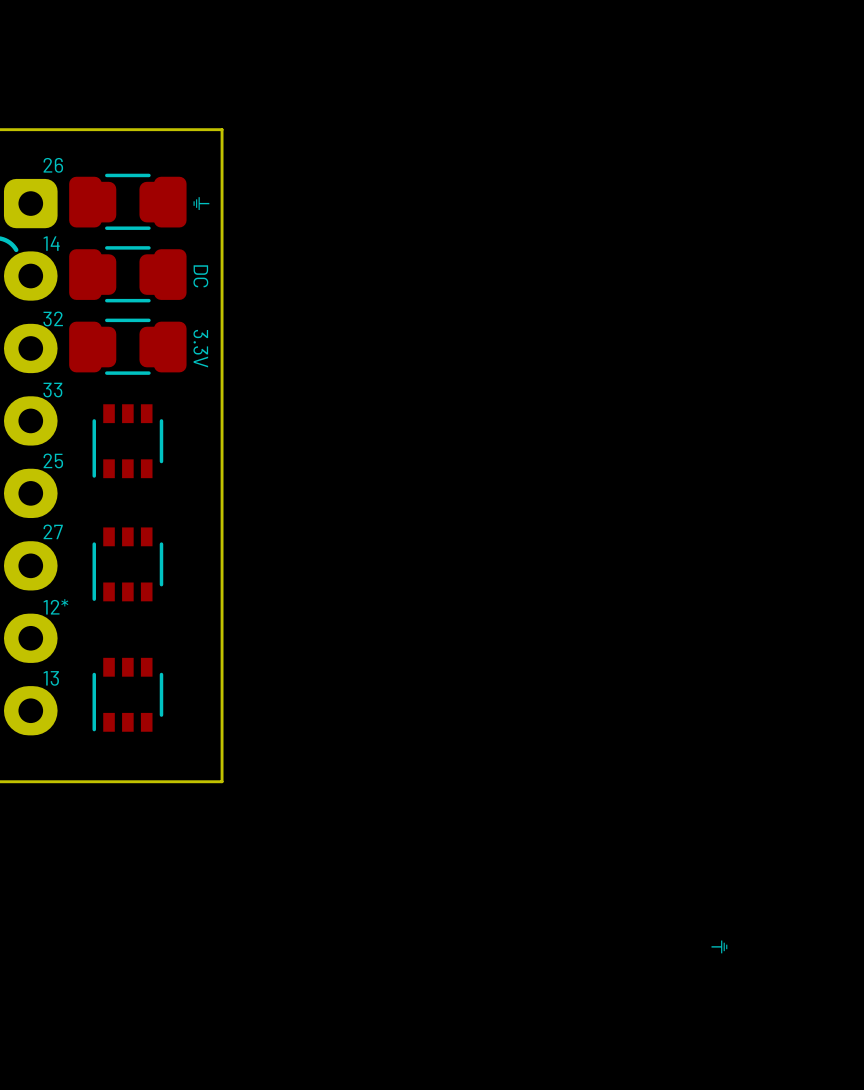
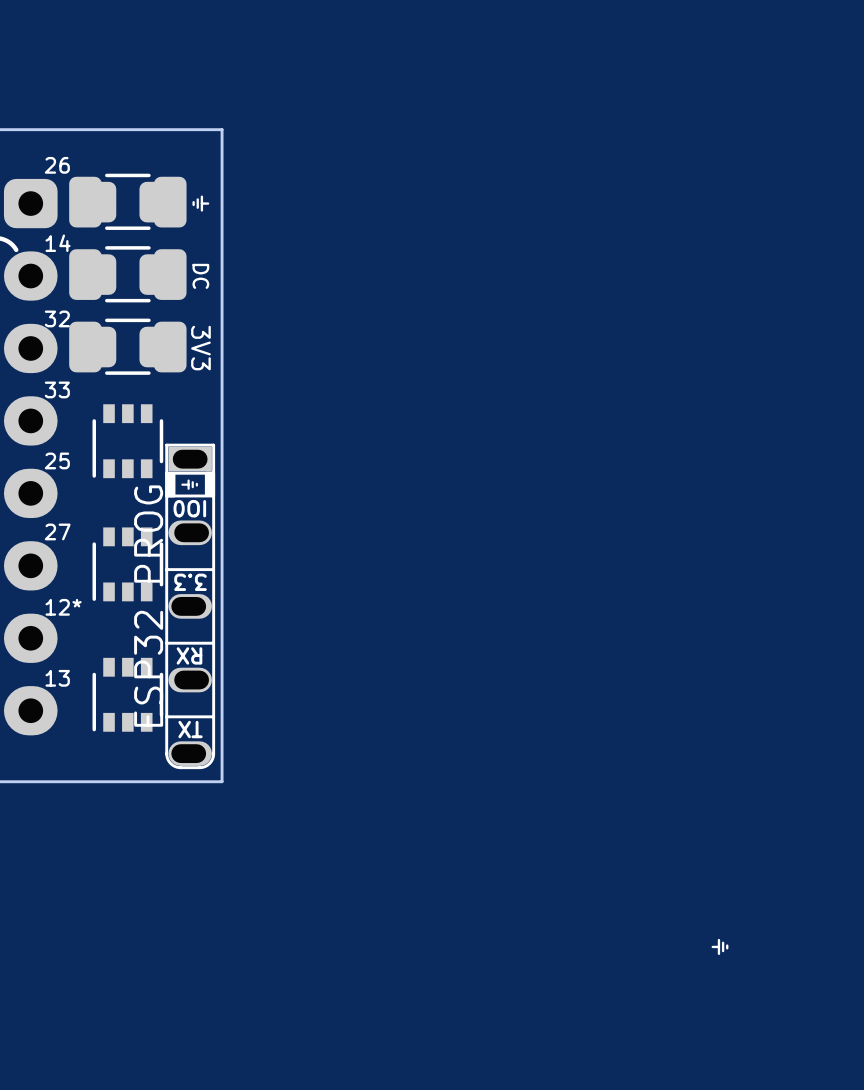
text: 3.3V (200, 348) -> 3V3 (200, 348)
part: none -> (190, 606)

